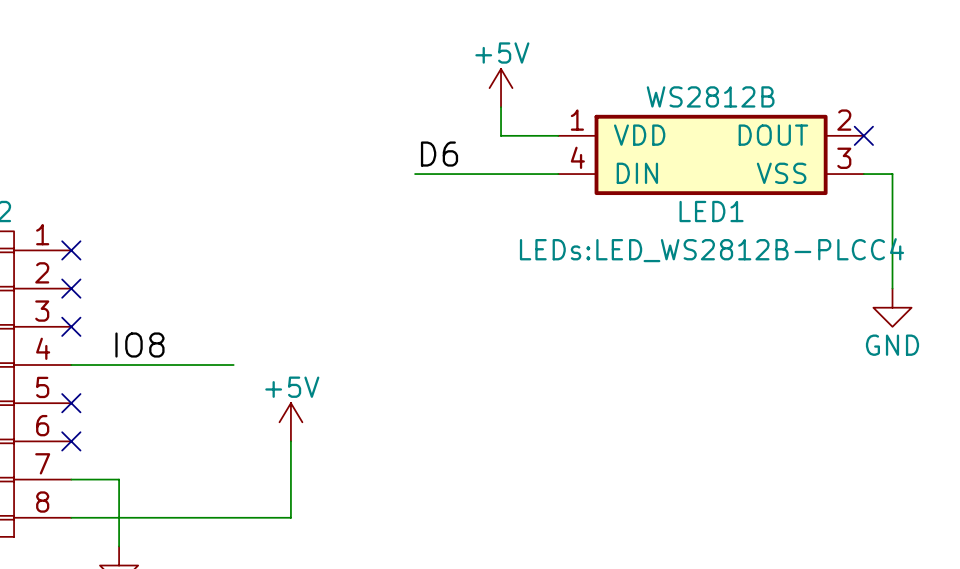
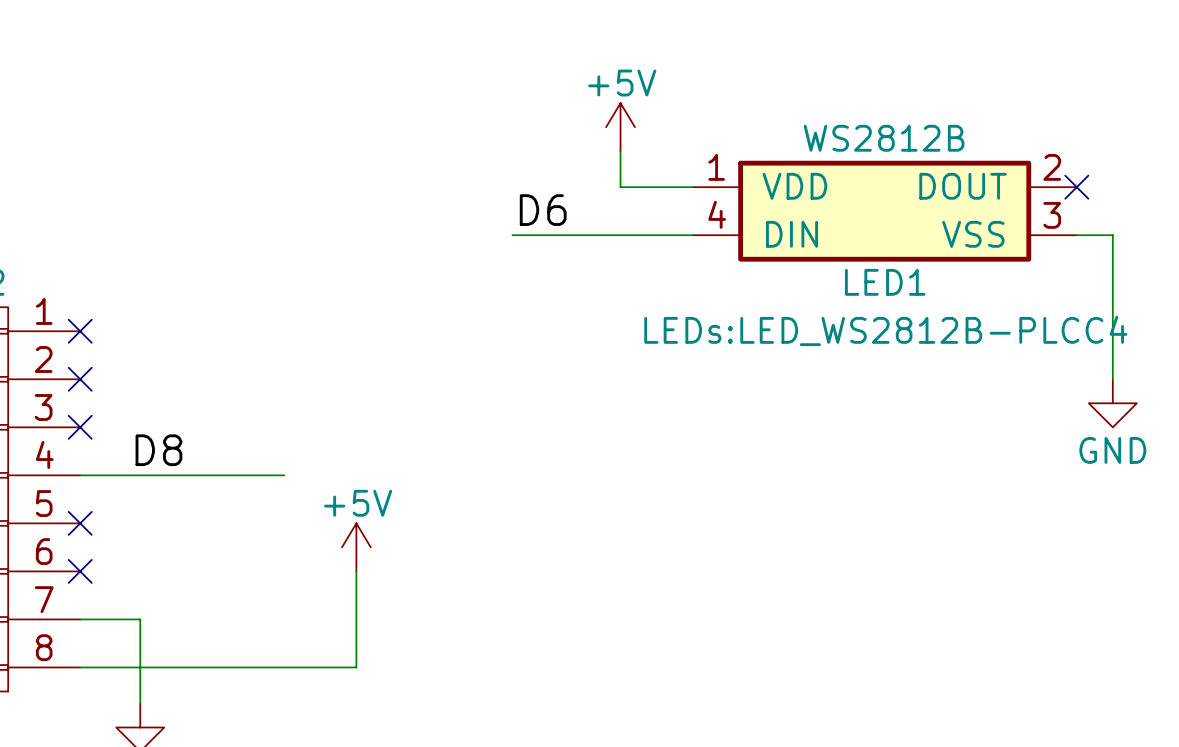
label: IO8 (139, 345) -> D8 (158, 450)

